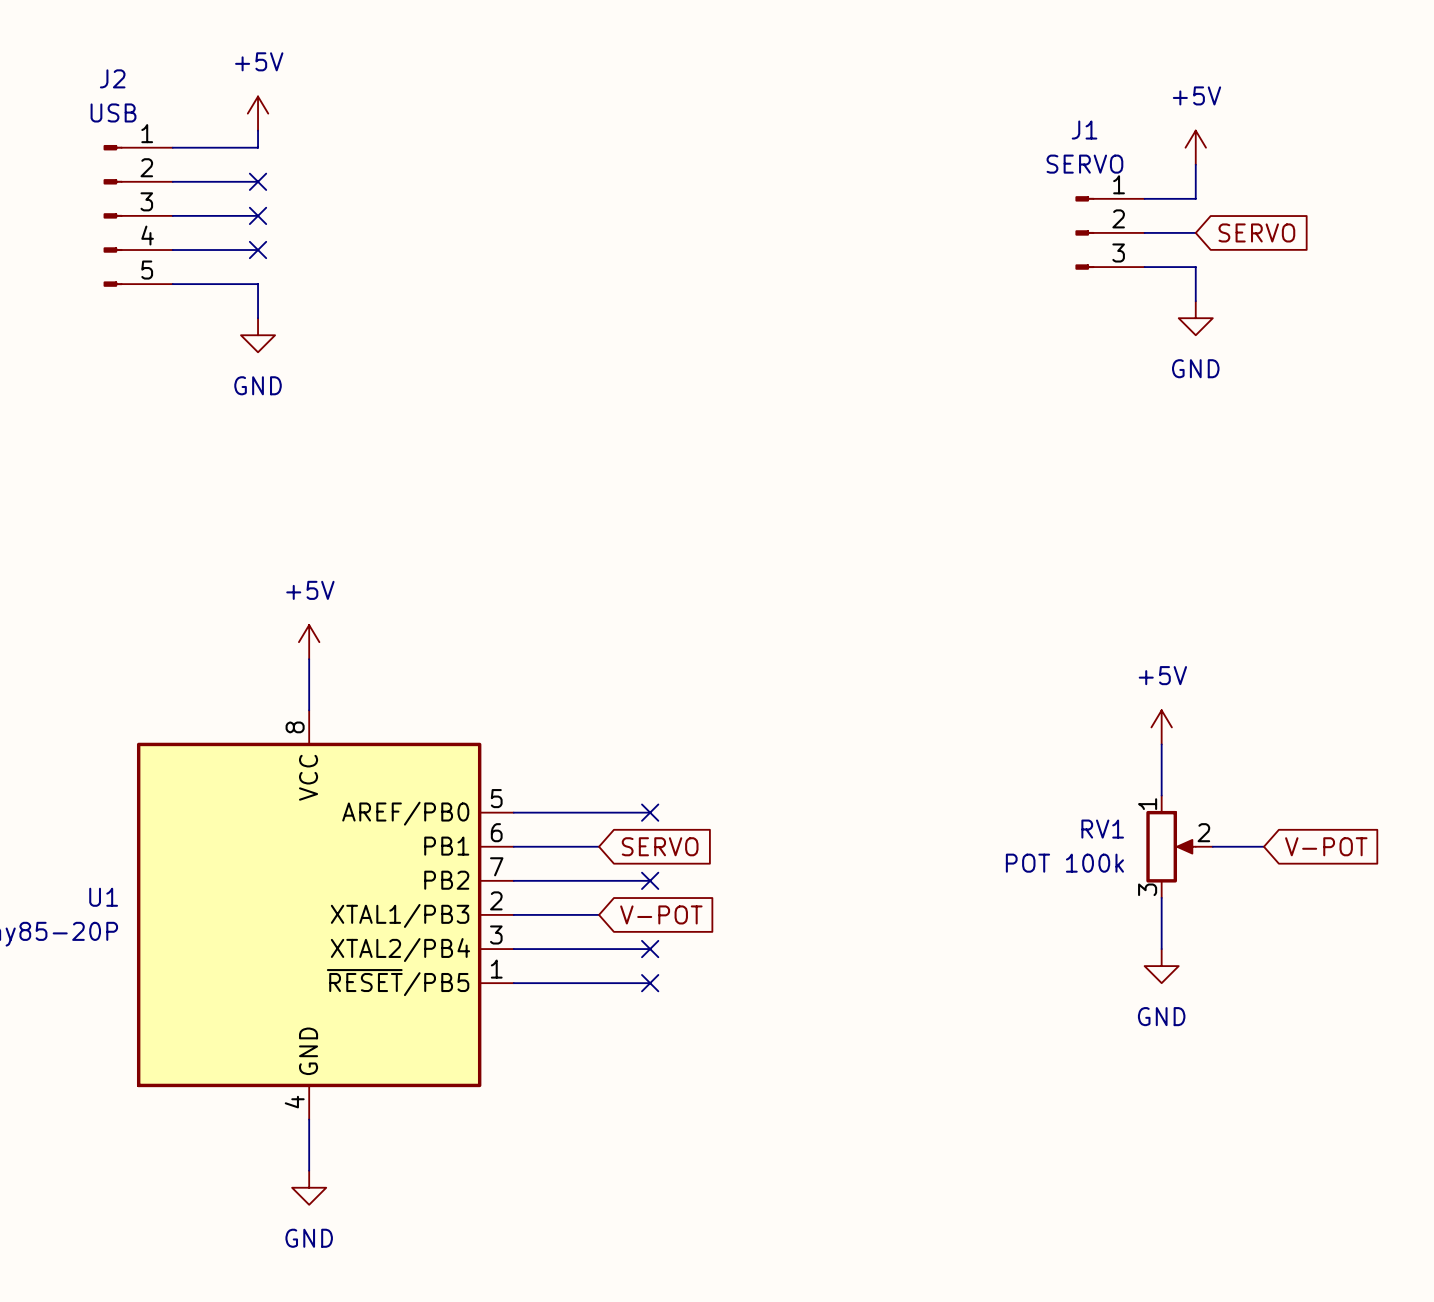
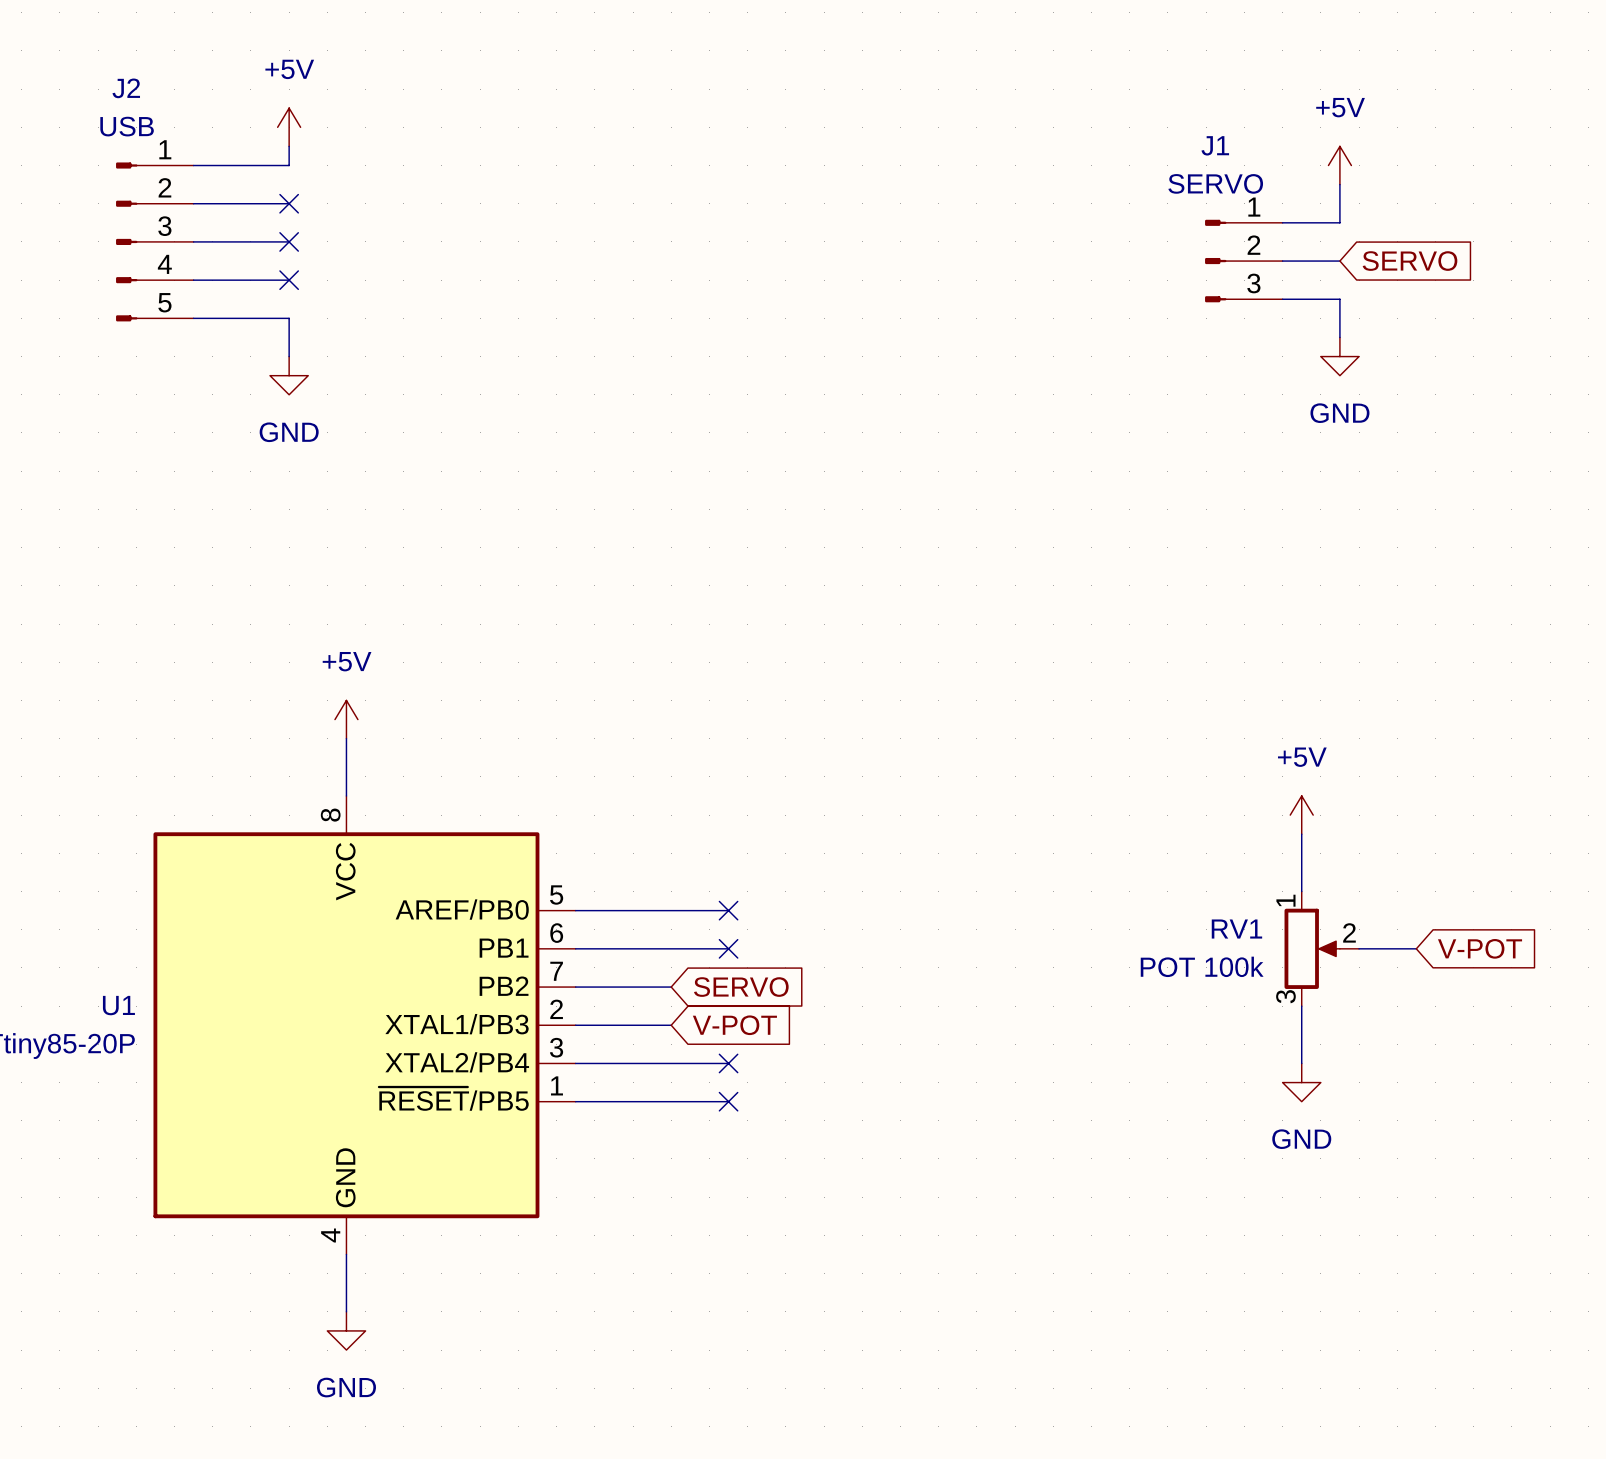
global label position: SERVO (660, 846) -> SERVO (741, 987)
wire: (599, 880) (650, 880) -> (671, 948) (728, 948)
no-connect mark position: (650, 880) -> (728, 948)

